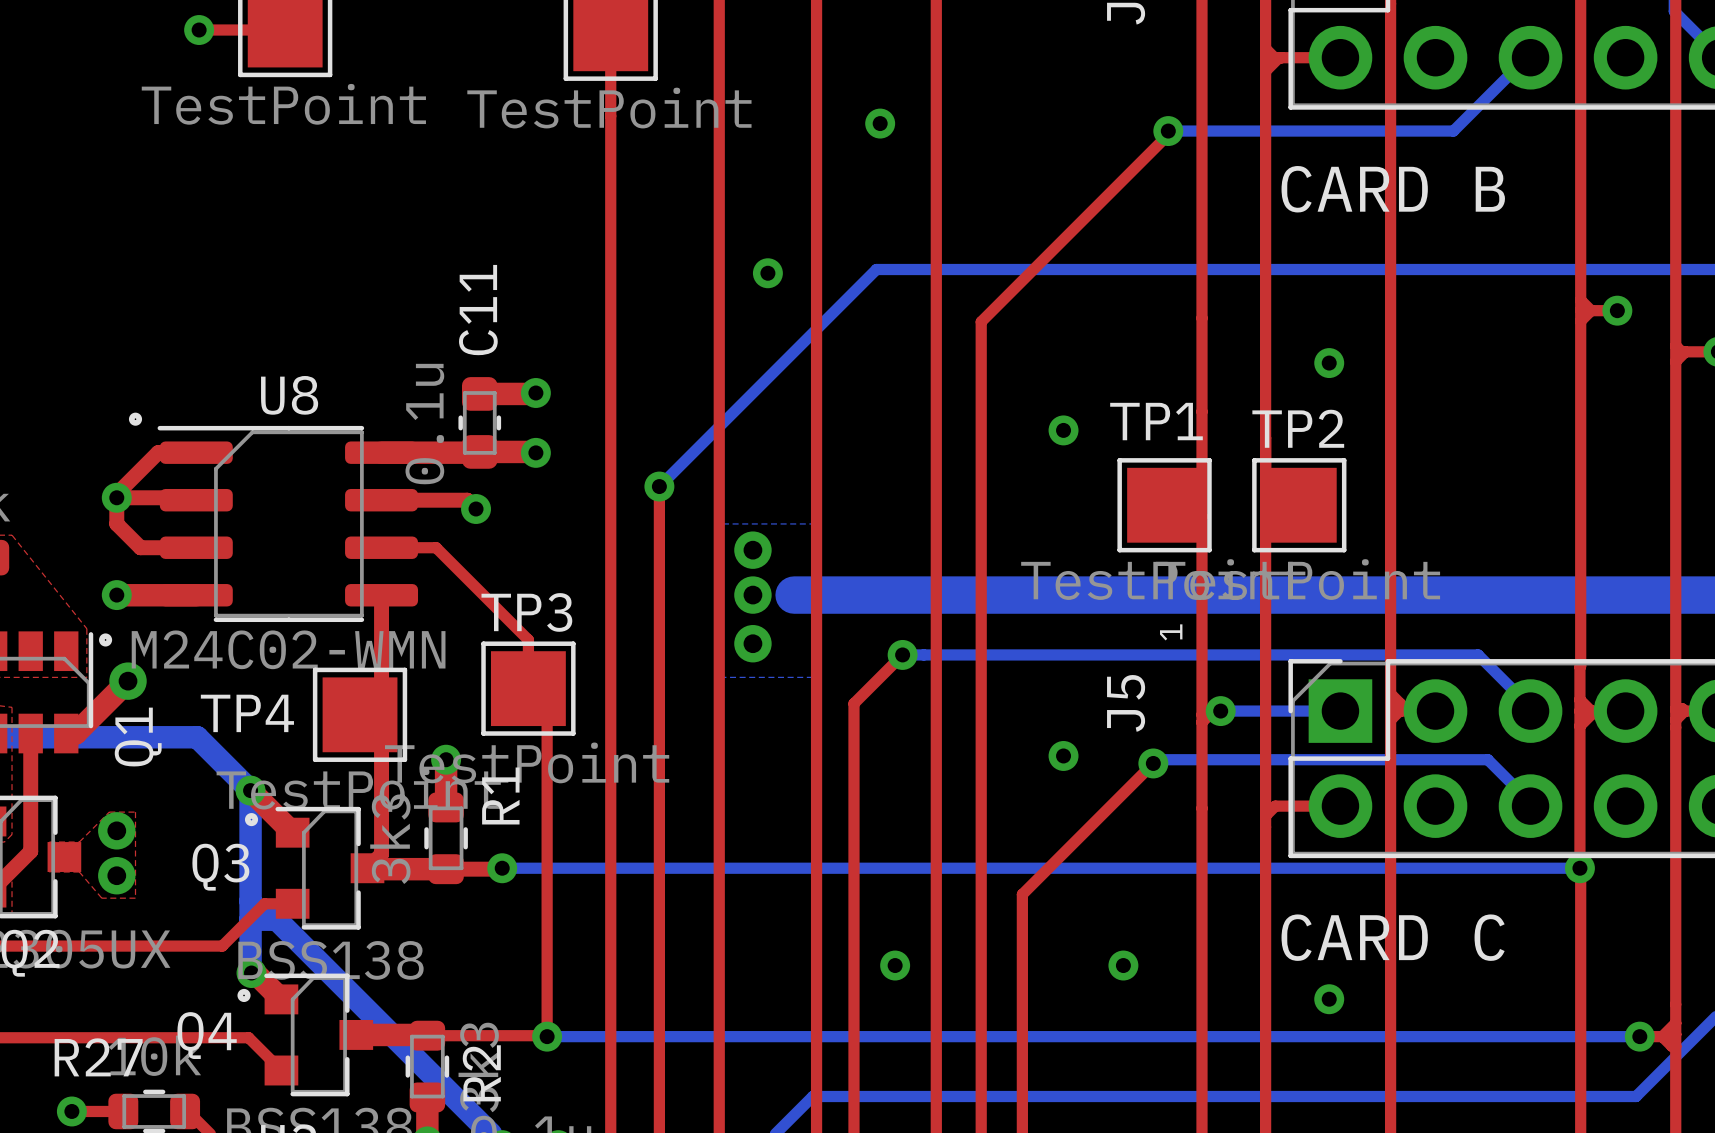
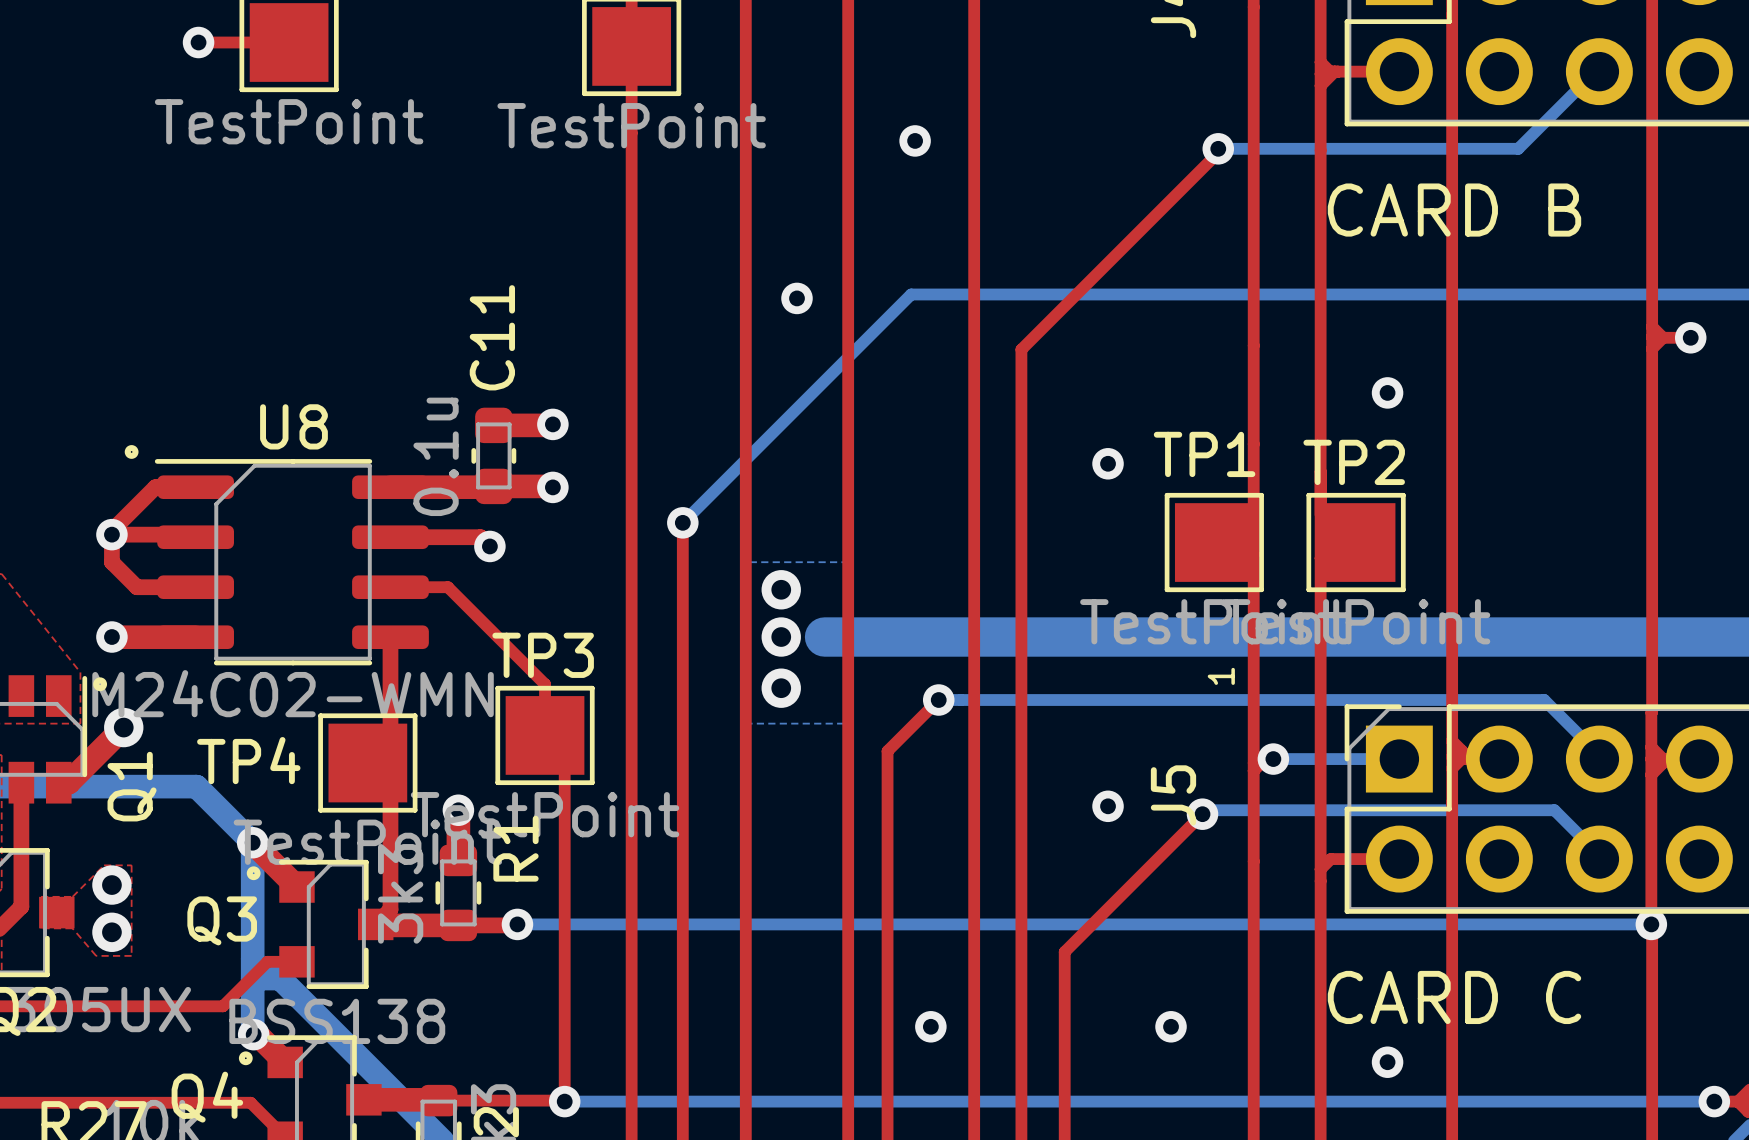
J5 name position: J5 (1126, 703) -> J5 (1173, 795)

